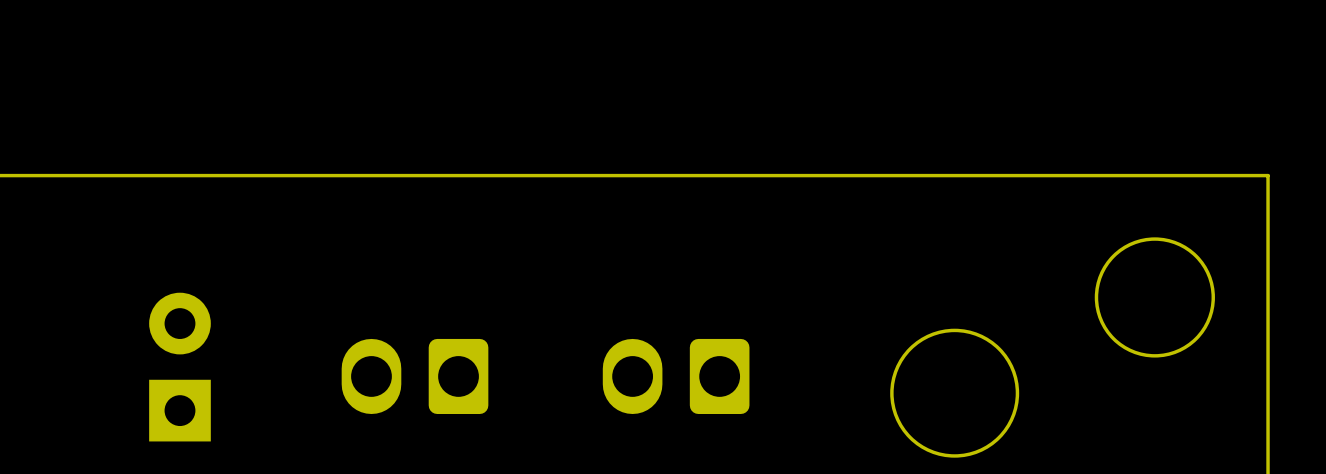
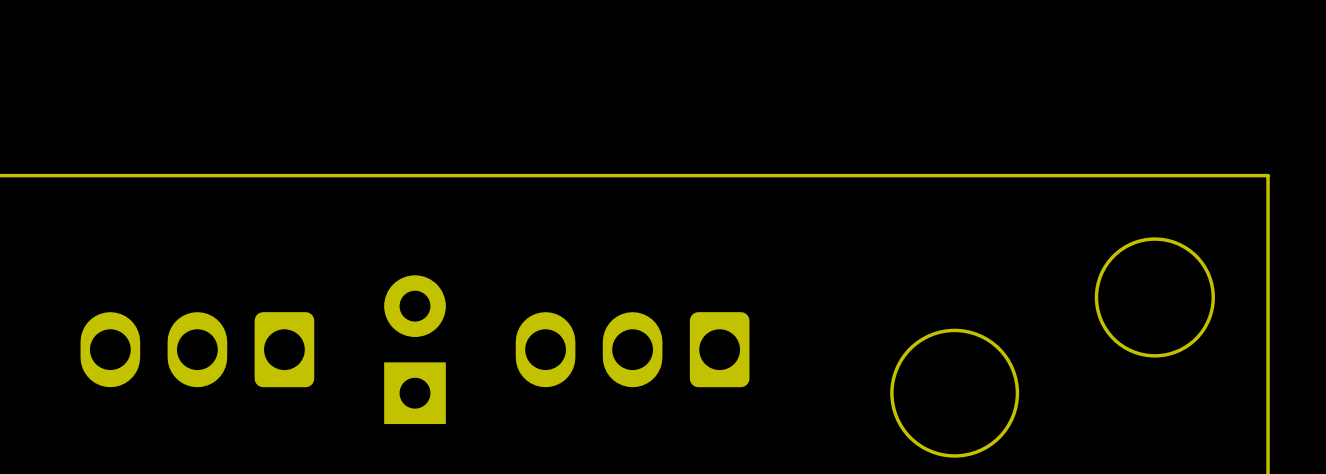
part footprint: [149, 292, 211, 442] -> [80, 312, 315, 388]
part footprint: [341, 338, 489, 415] -> [384, 275, 446, 425]
part: none -> (632, 349)
part: (676, 376) -> none

